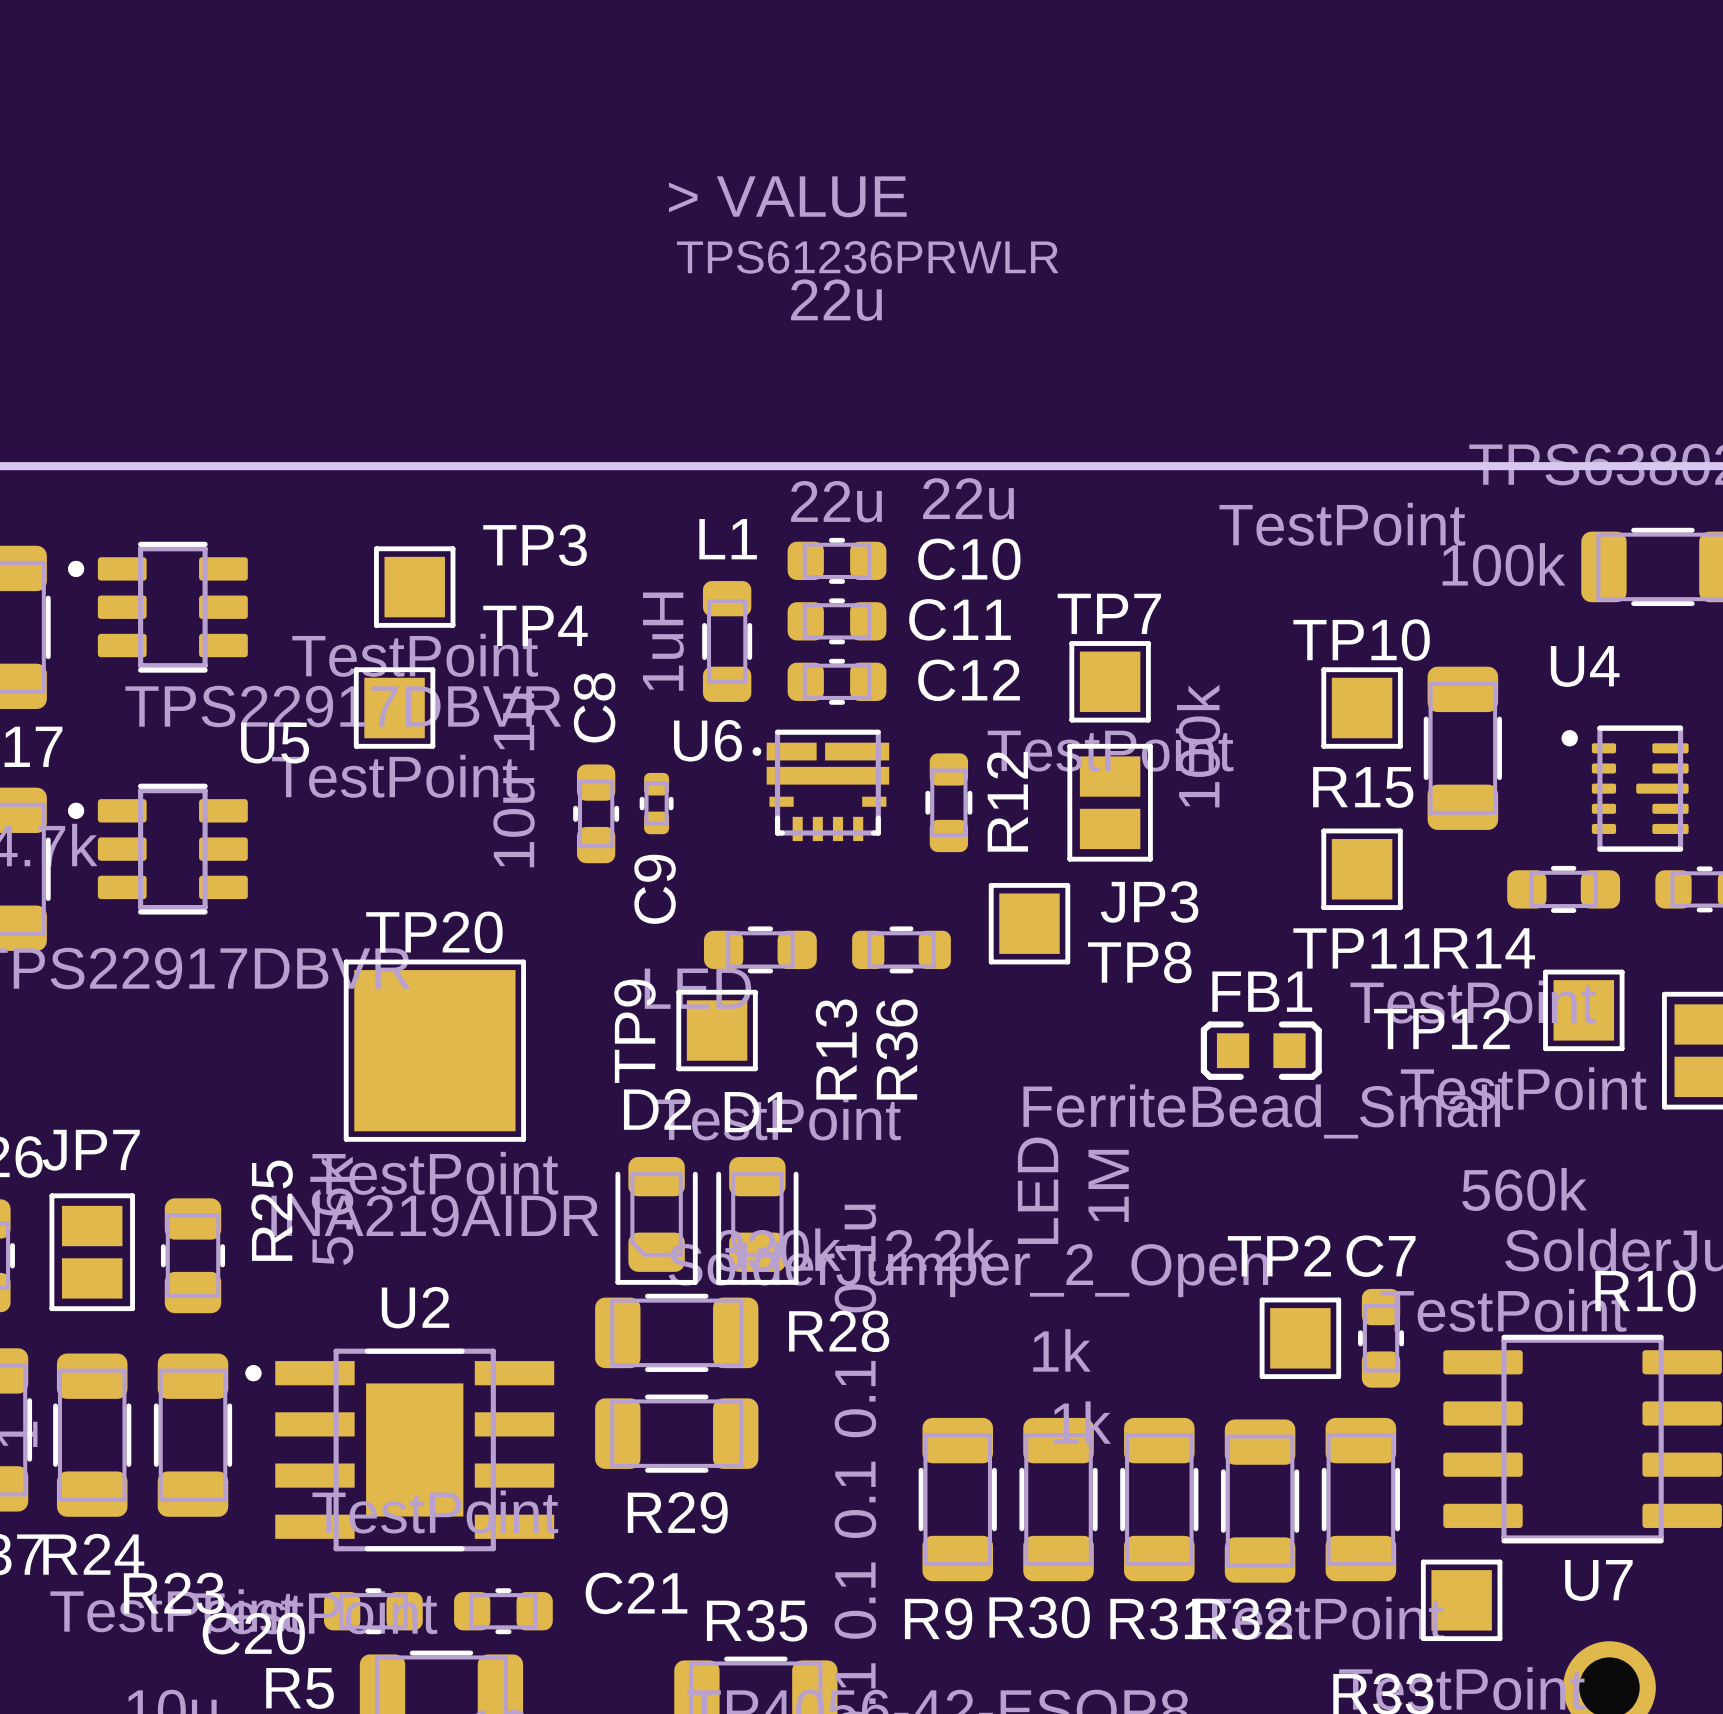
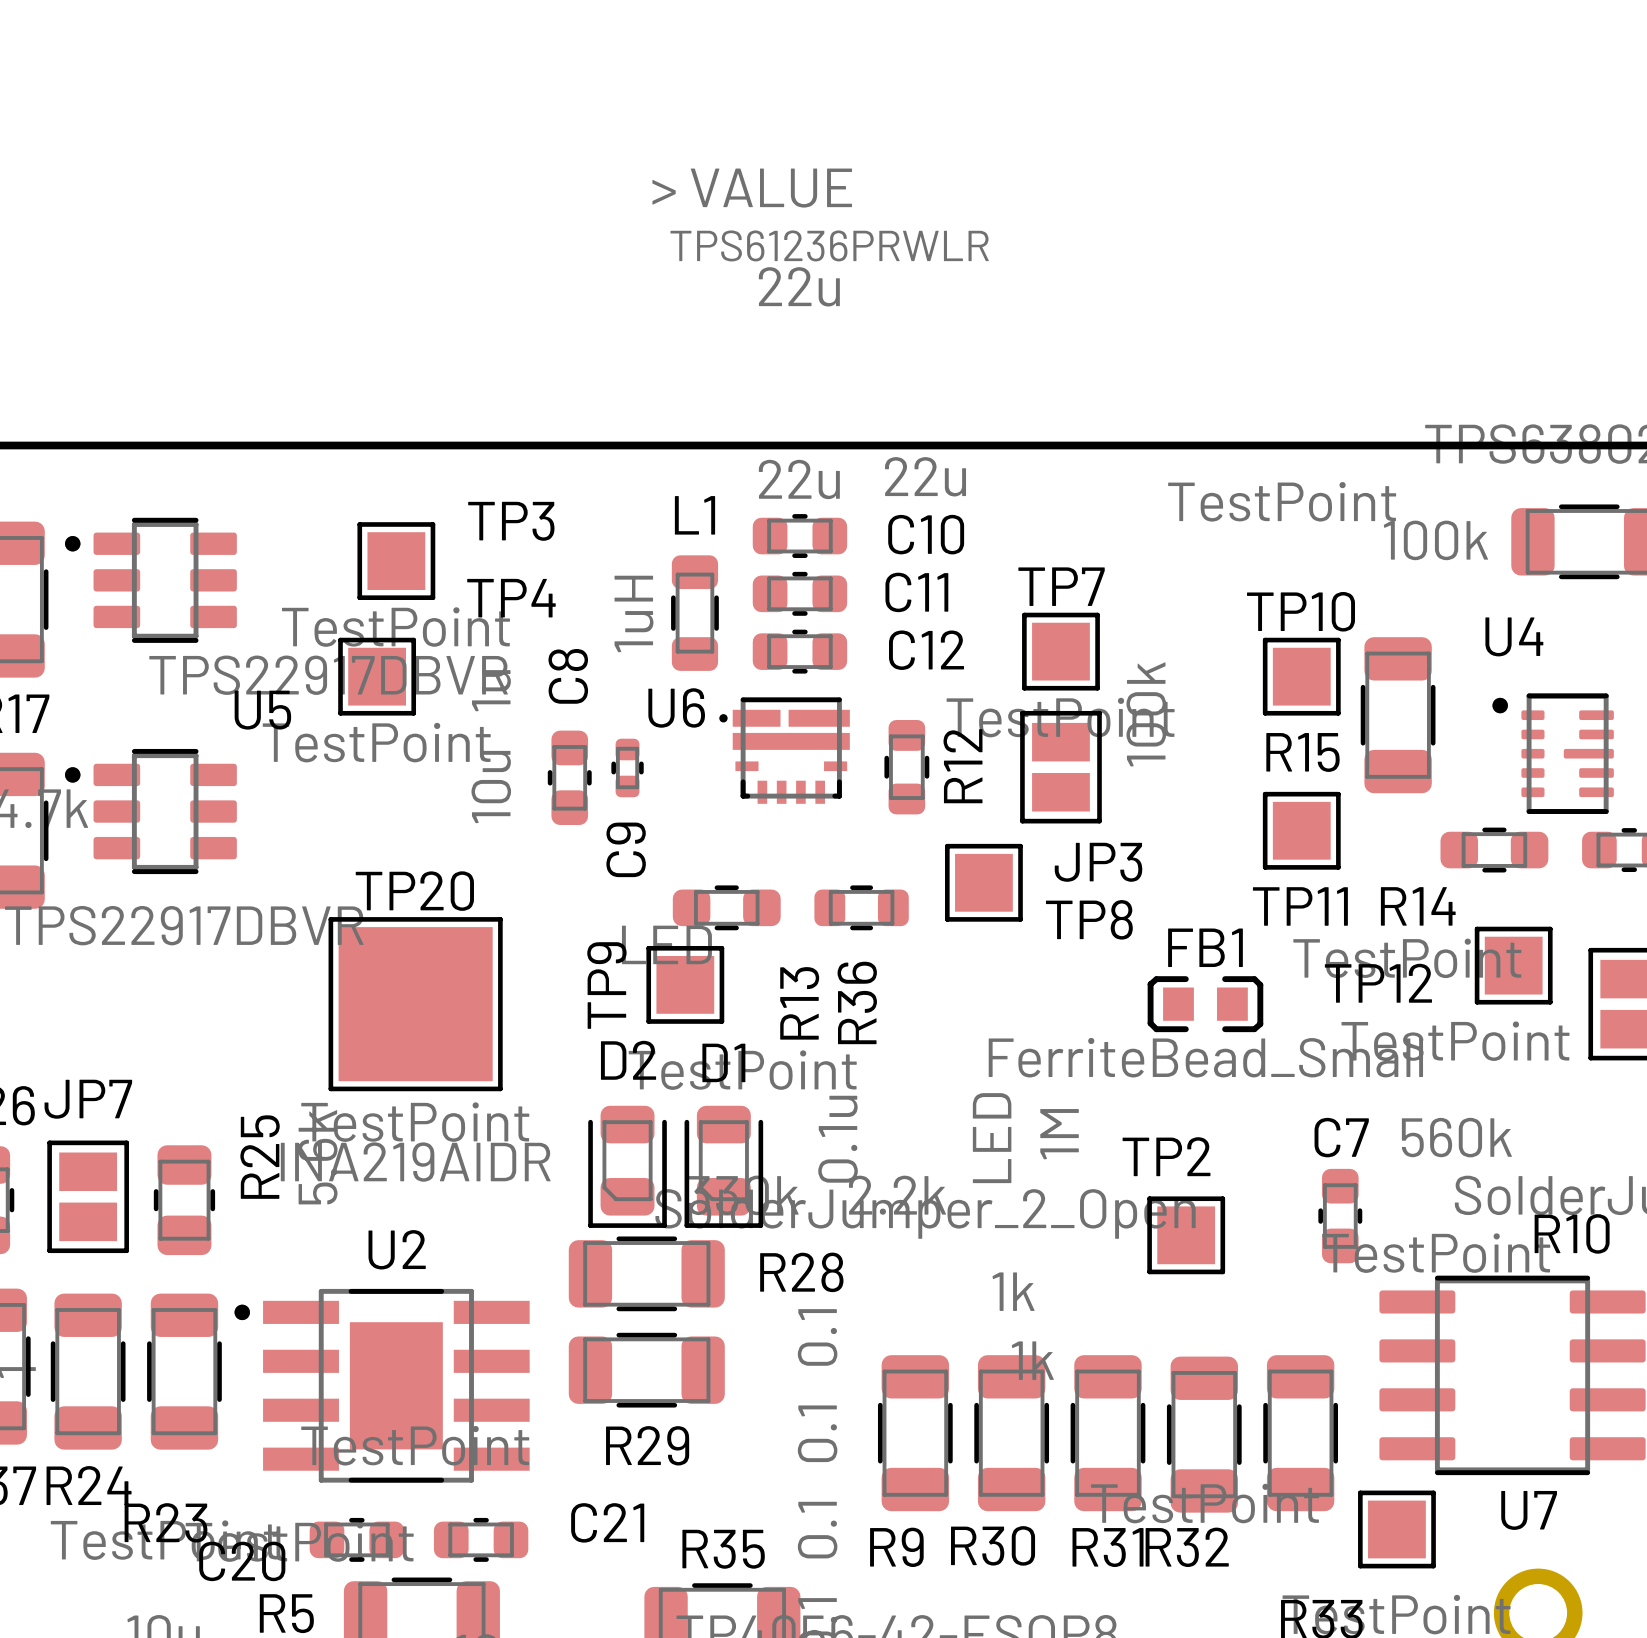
TP2 position: (1300, 1338) -> (1186, 1235)
C7 position: (1381, 1338) -> (1340, 1216)

